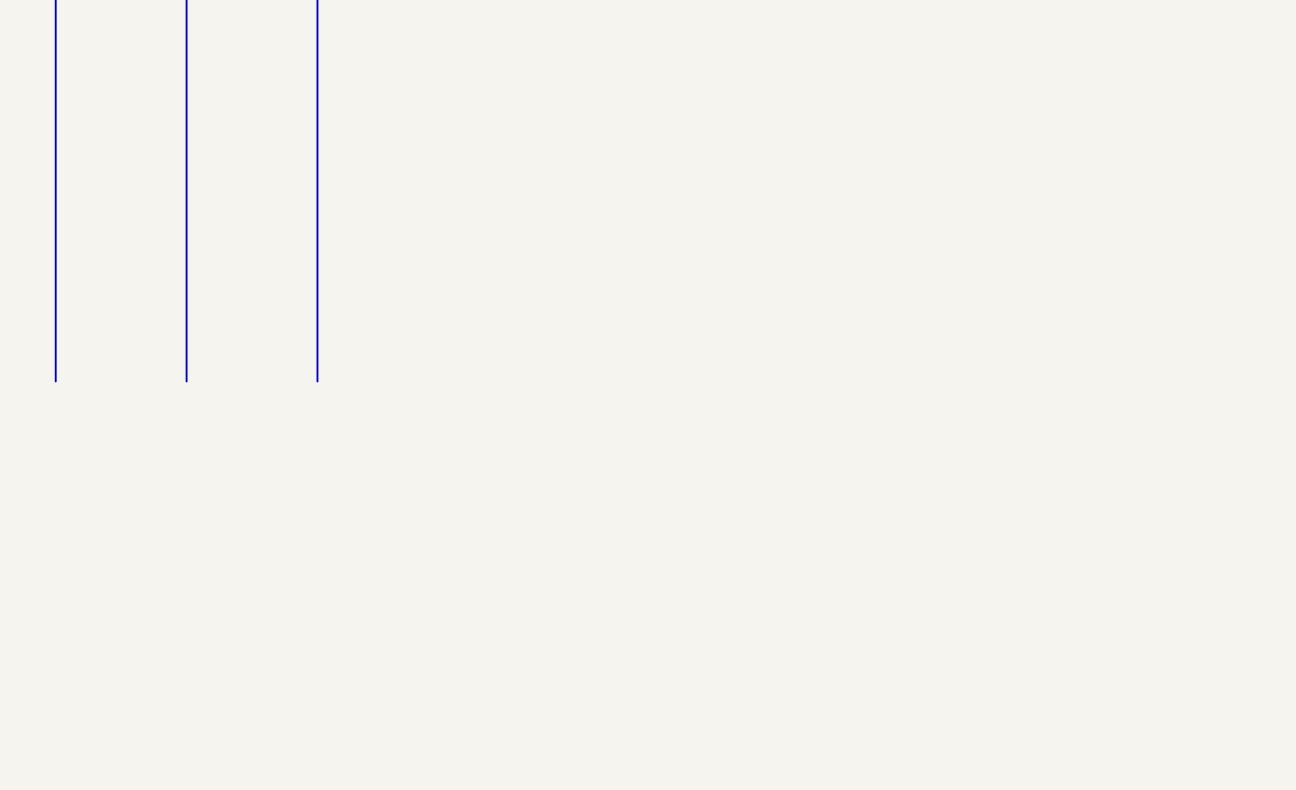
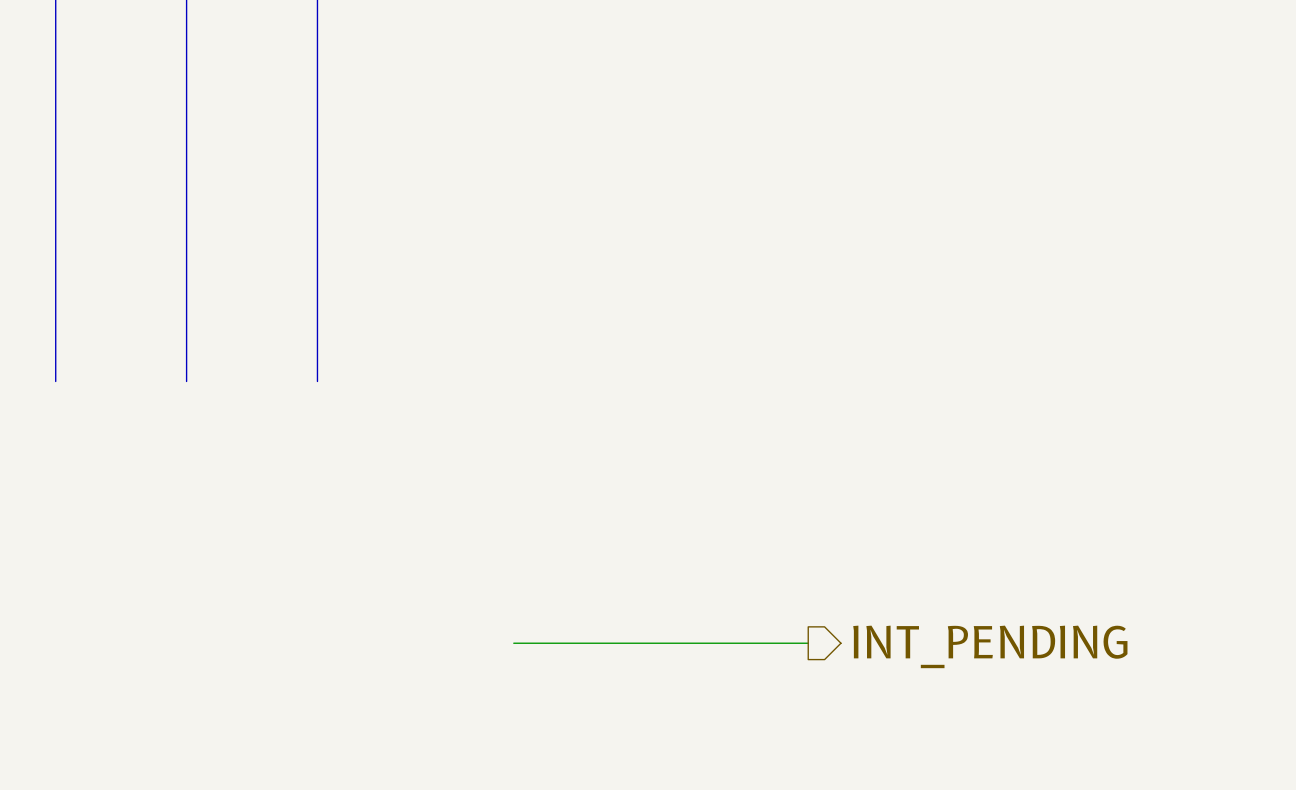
wire: none -> (513, 643) (808, 643)
hierarchical label: none -> INT_PENDING (990, 646)

